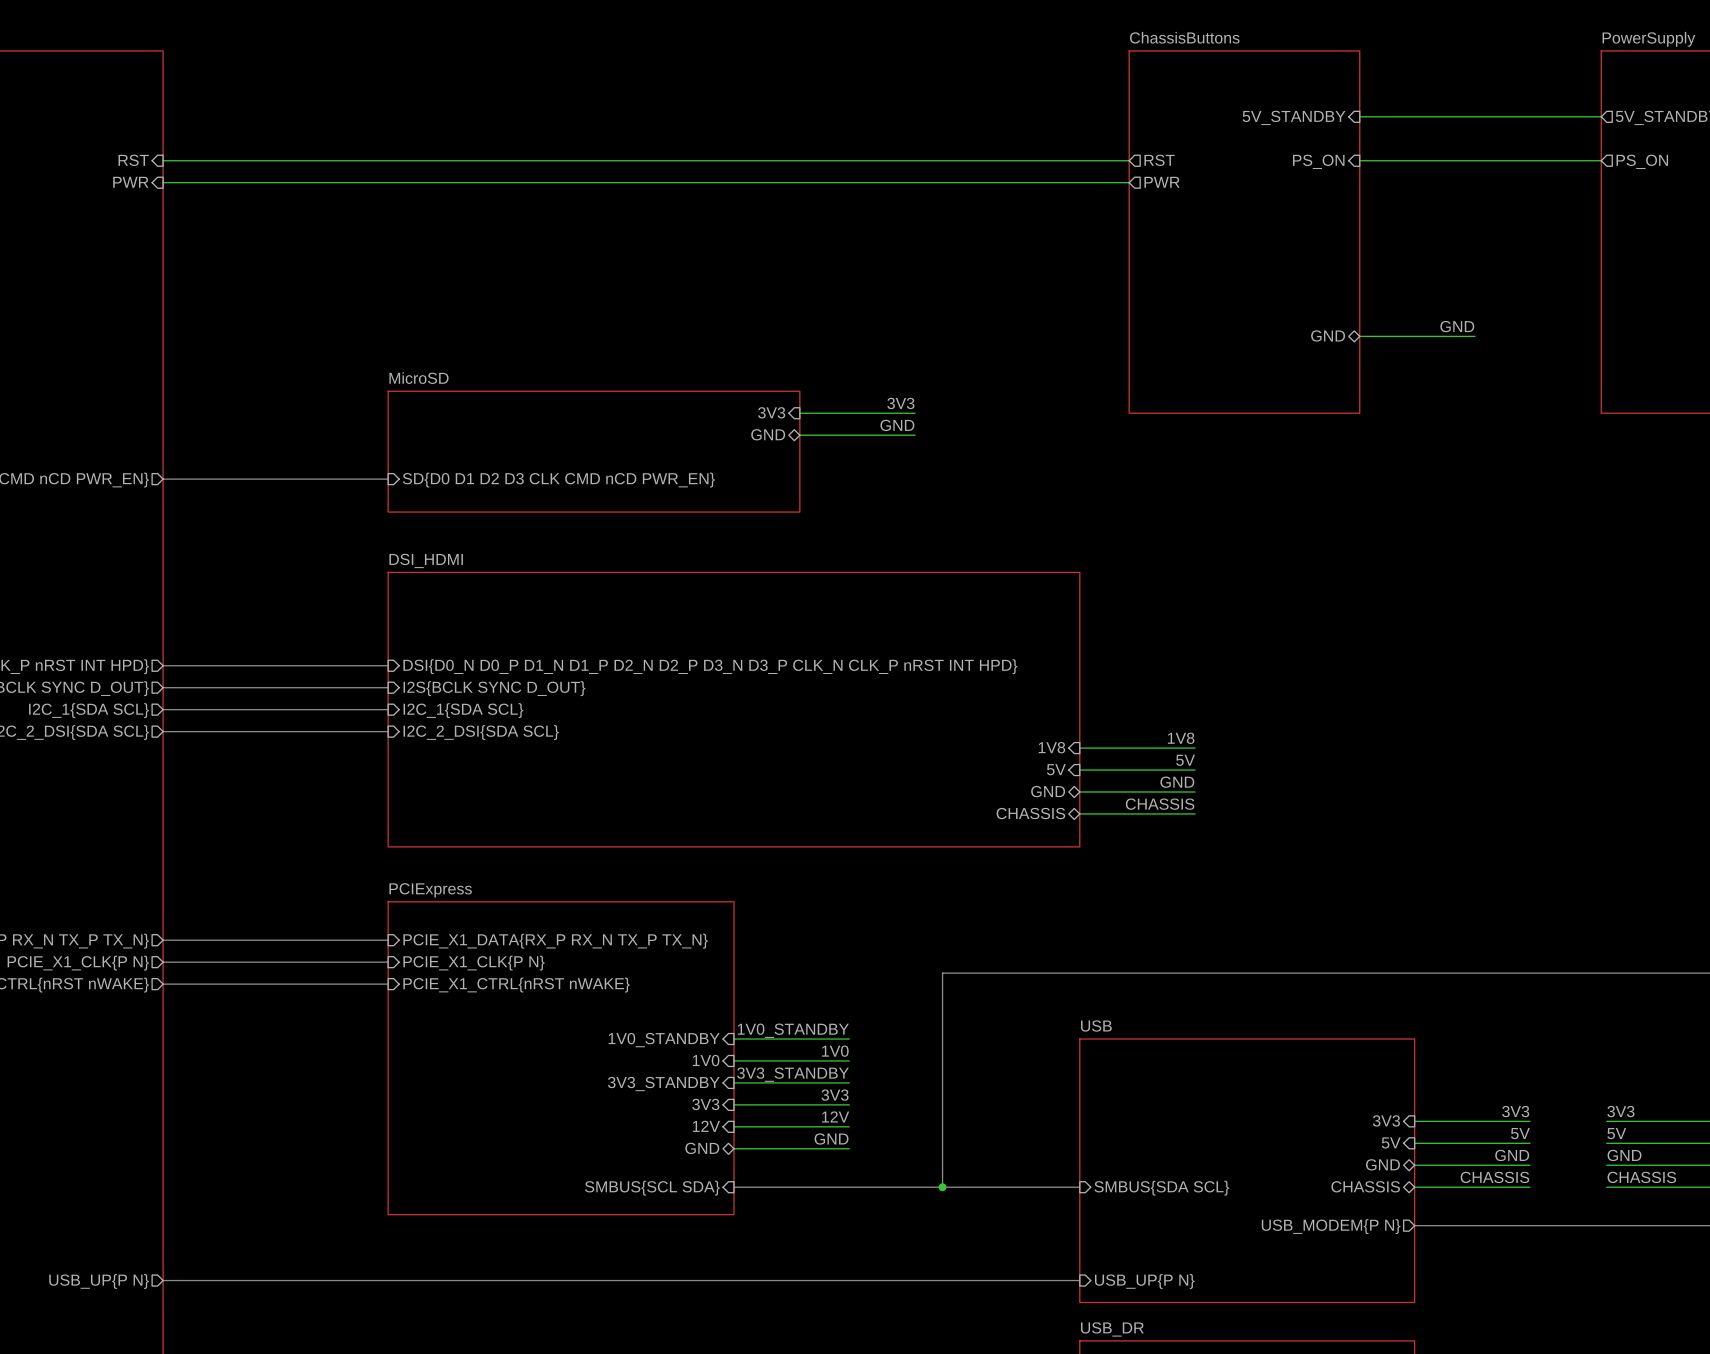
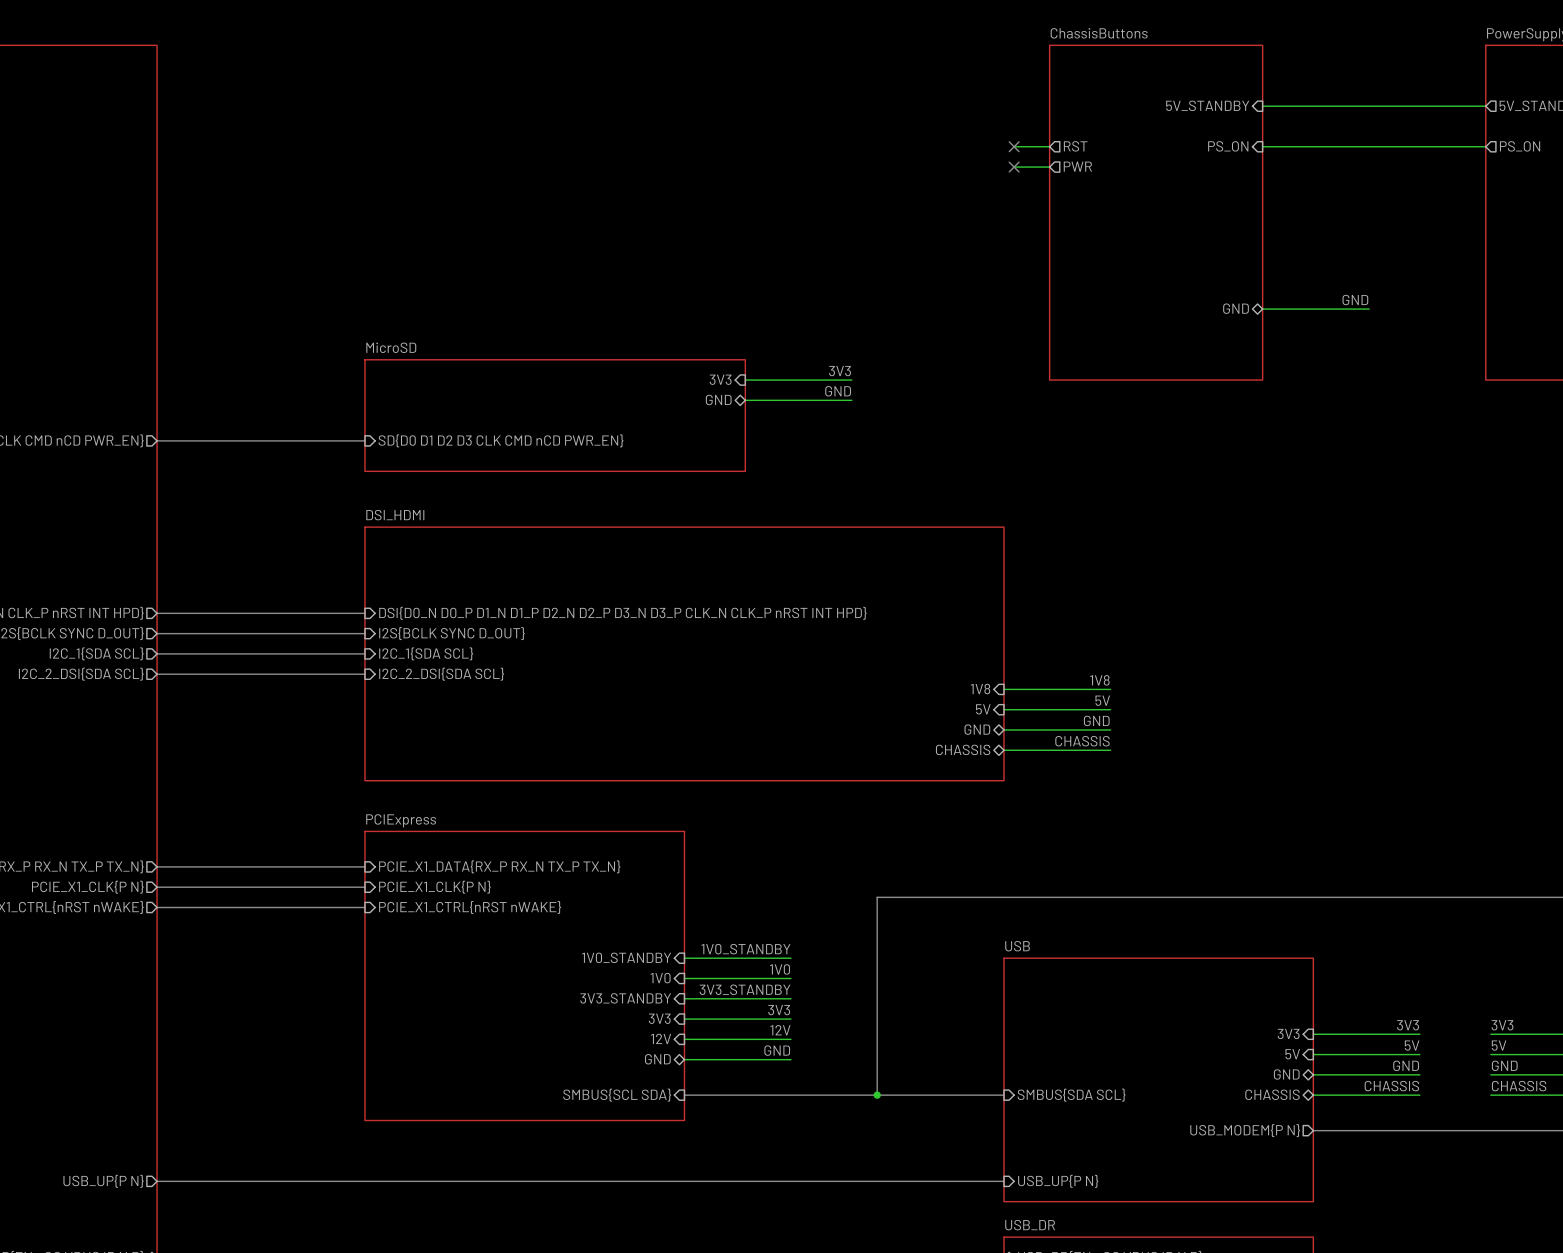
sheet pin: RST (133, 160) -> none
wire: (163, 160) (1090, 160) -> none
no-connect mark: none -> (1014, 146)
sheet pin: PWR (130, 182) -> none
wire: (163, 182) (1090, 182) -> none
no-connect mark: none -> (1014, 167)

